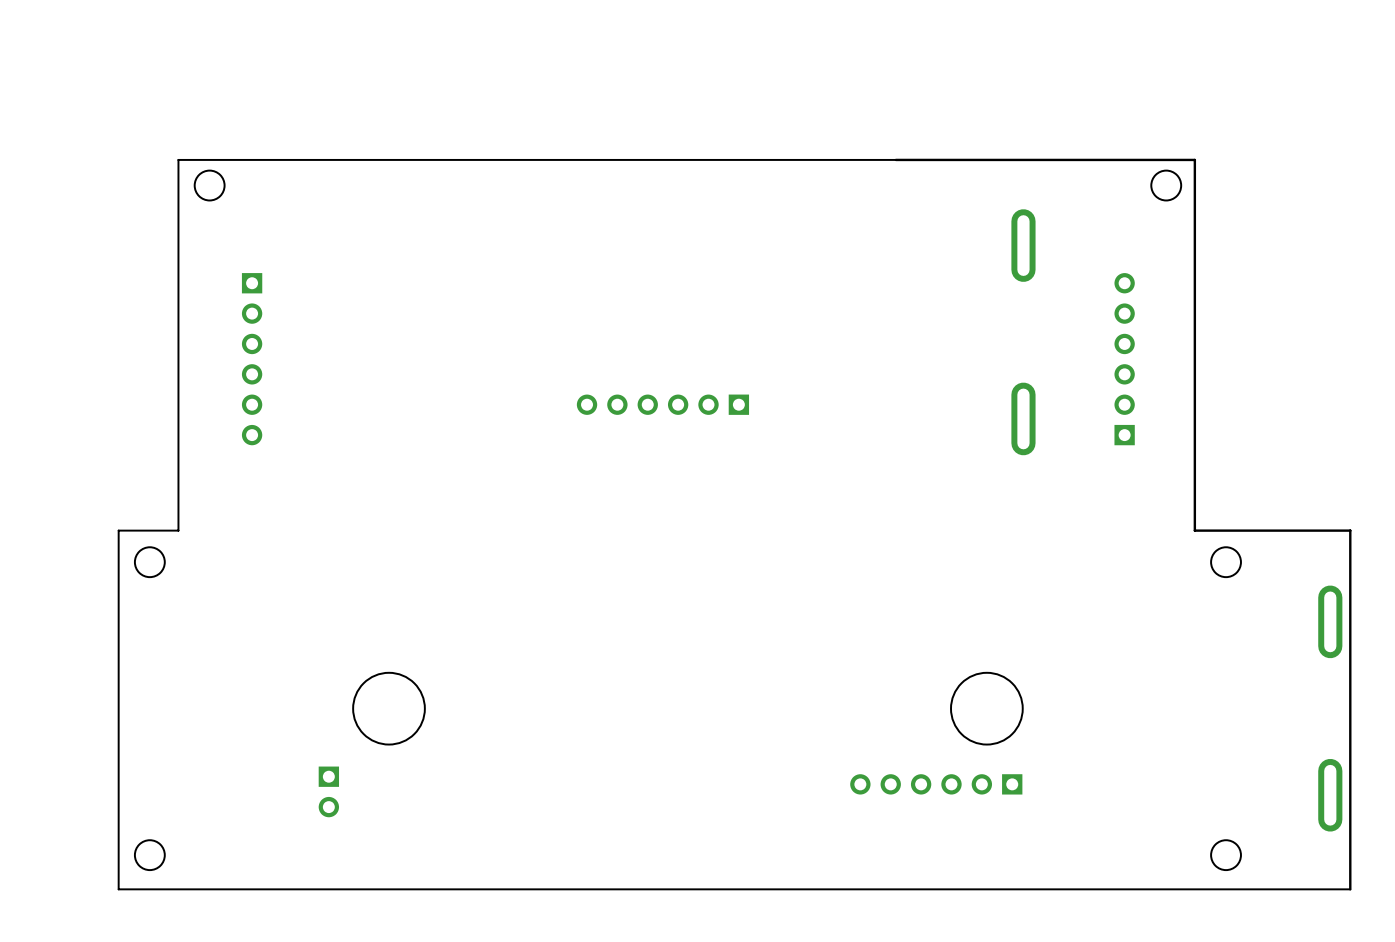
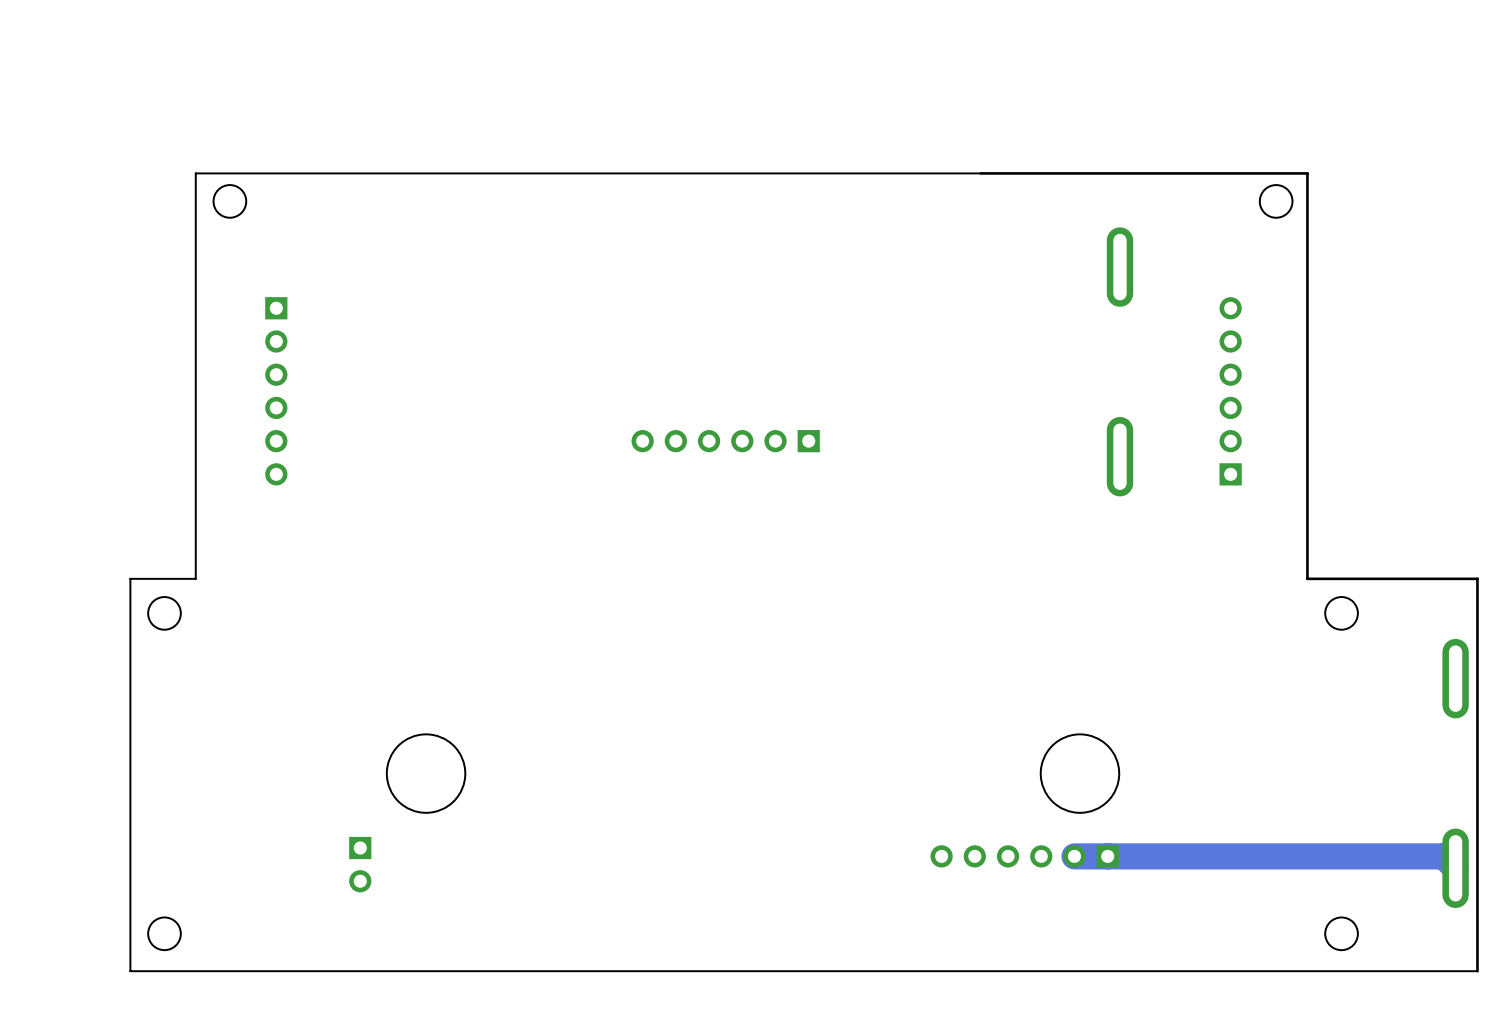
track: none -> (1074, 856) (1443, 856) (1455, 867)

